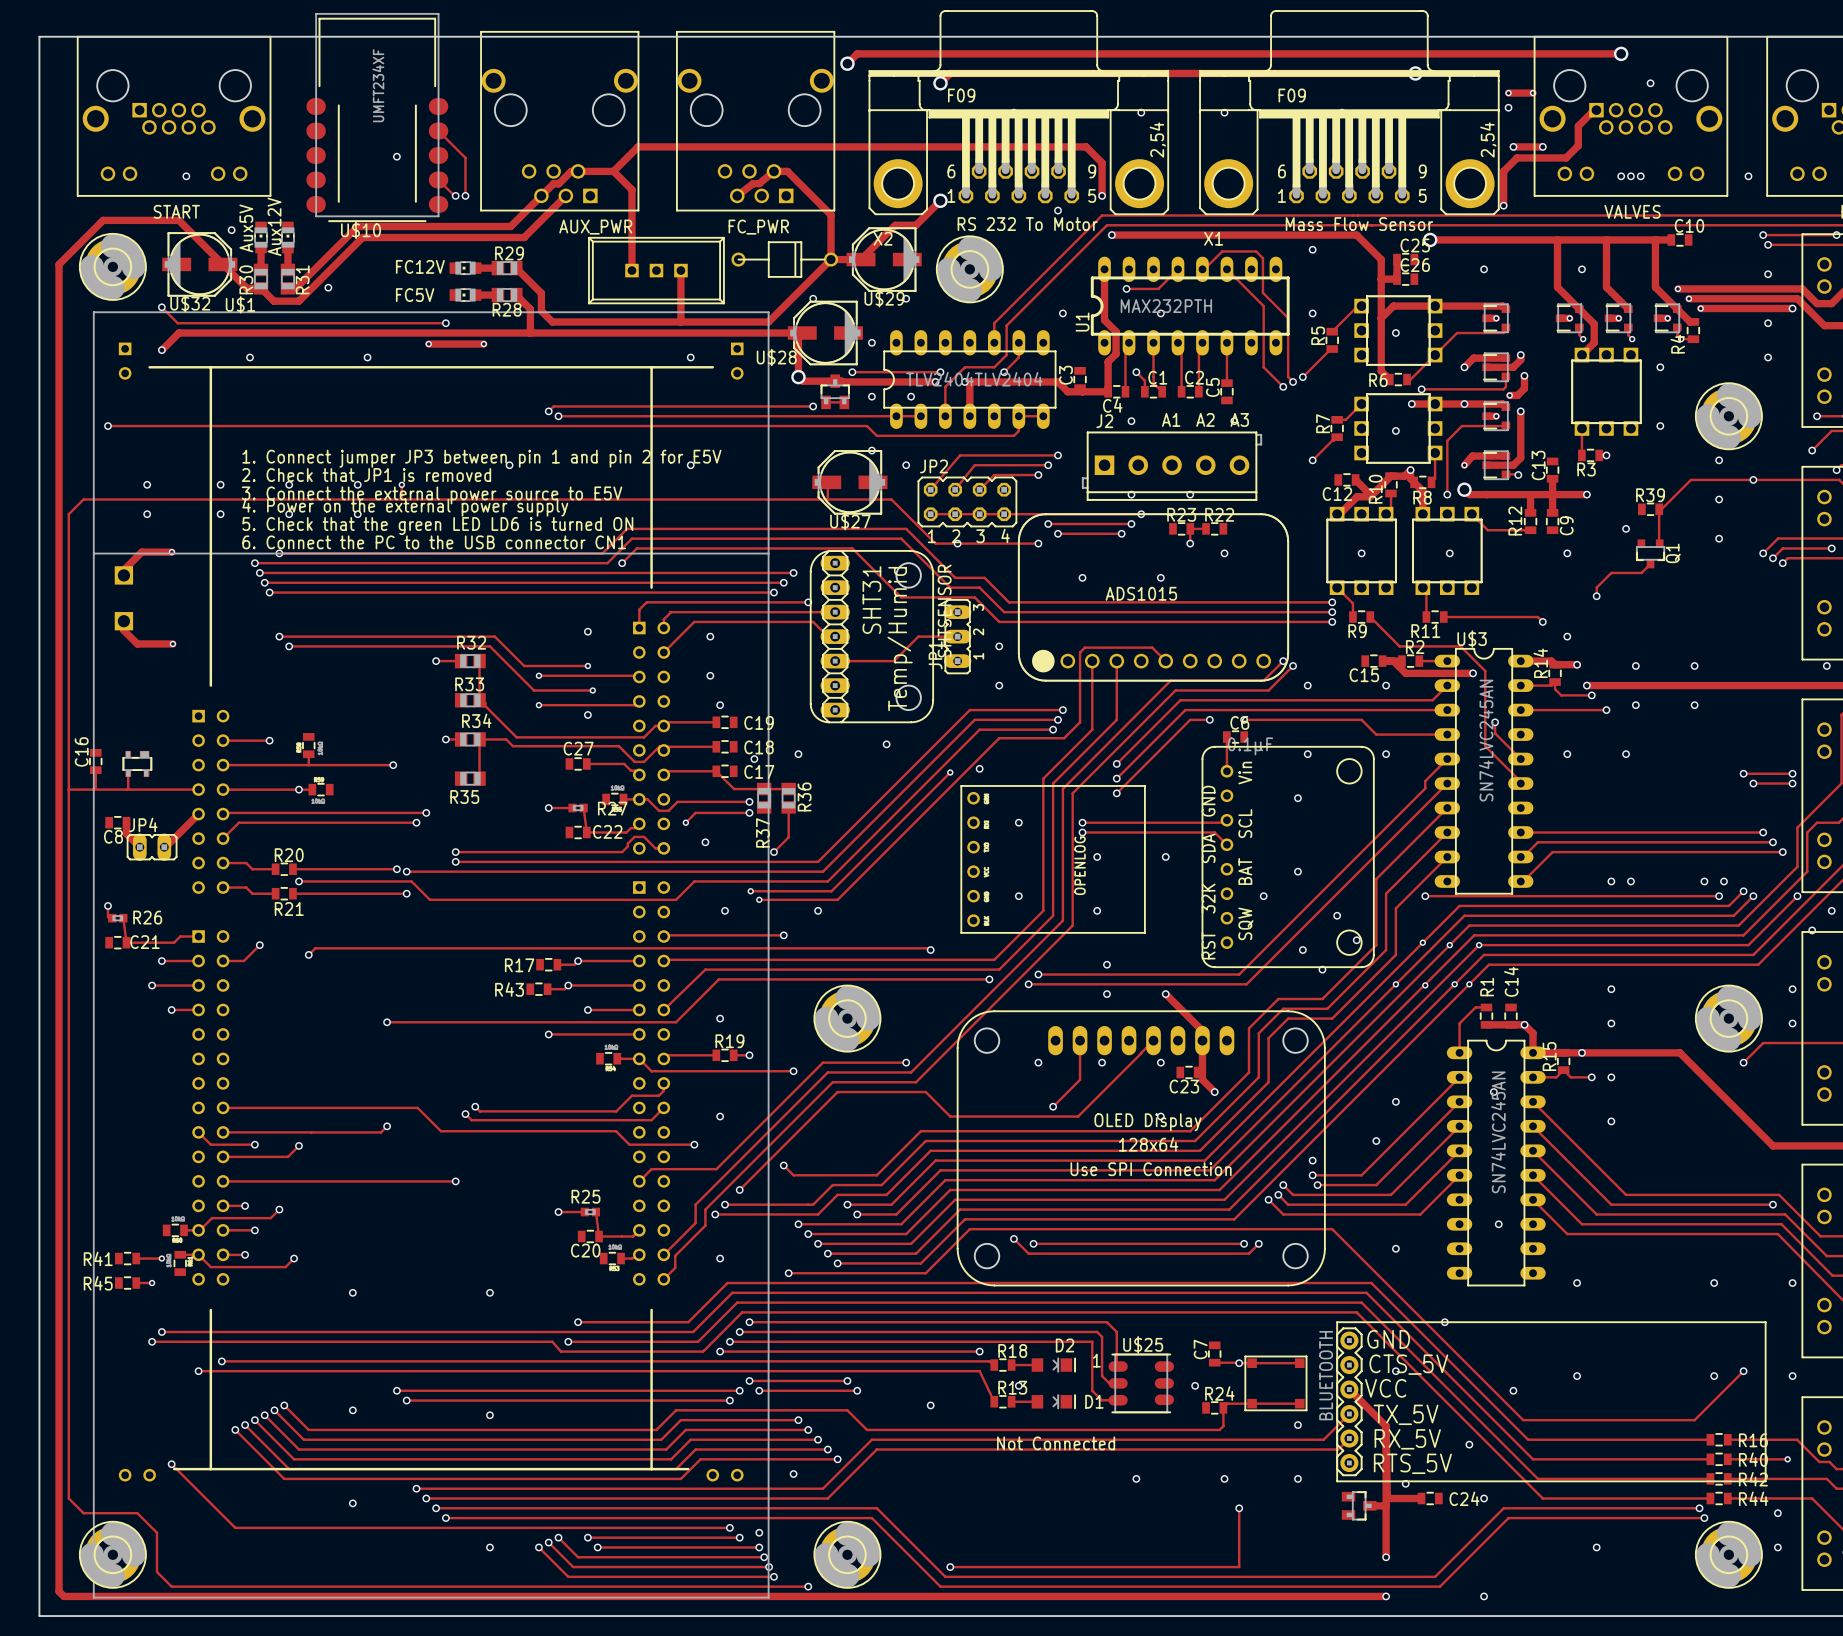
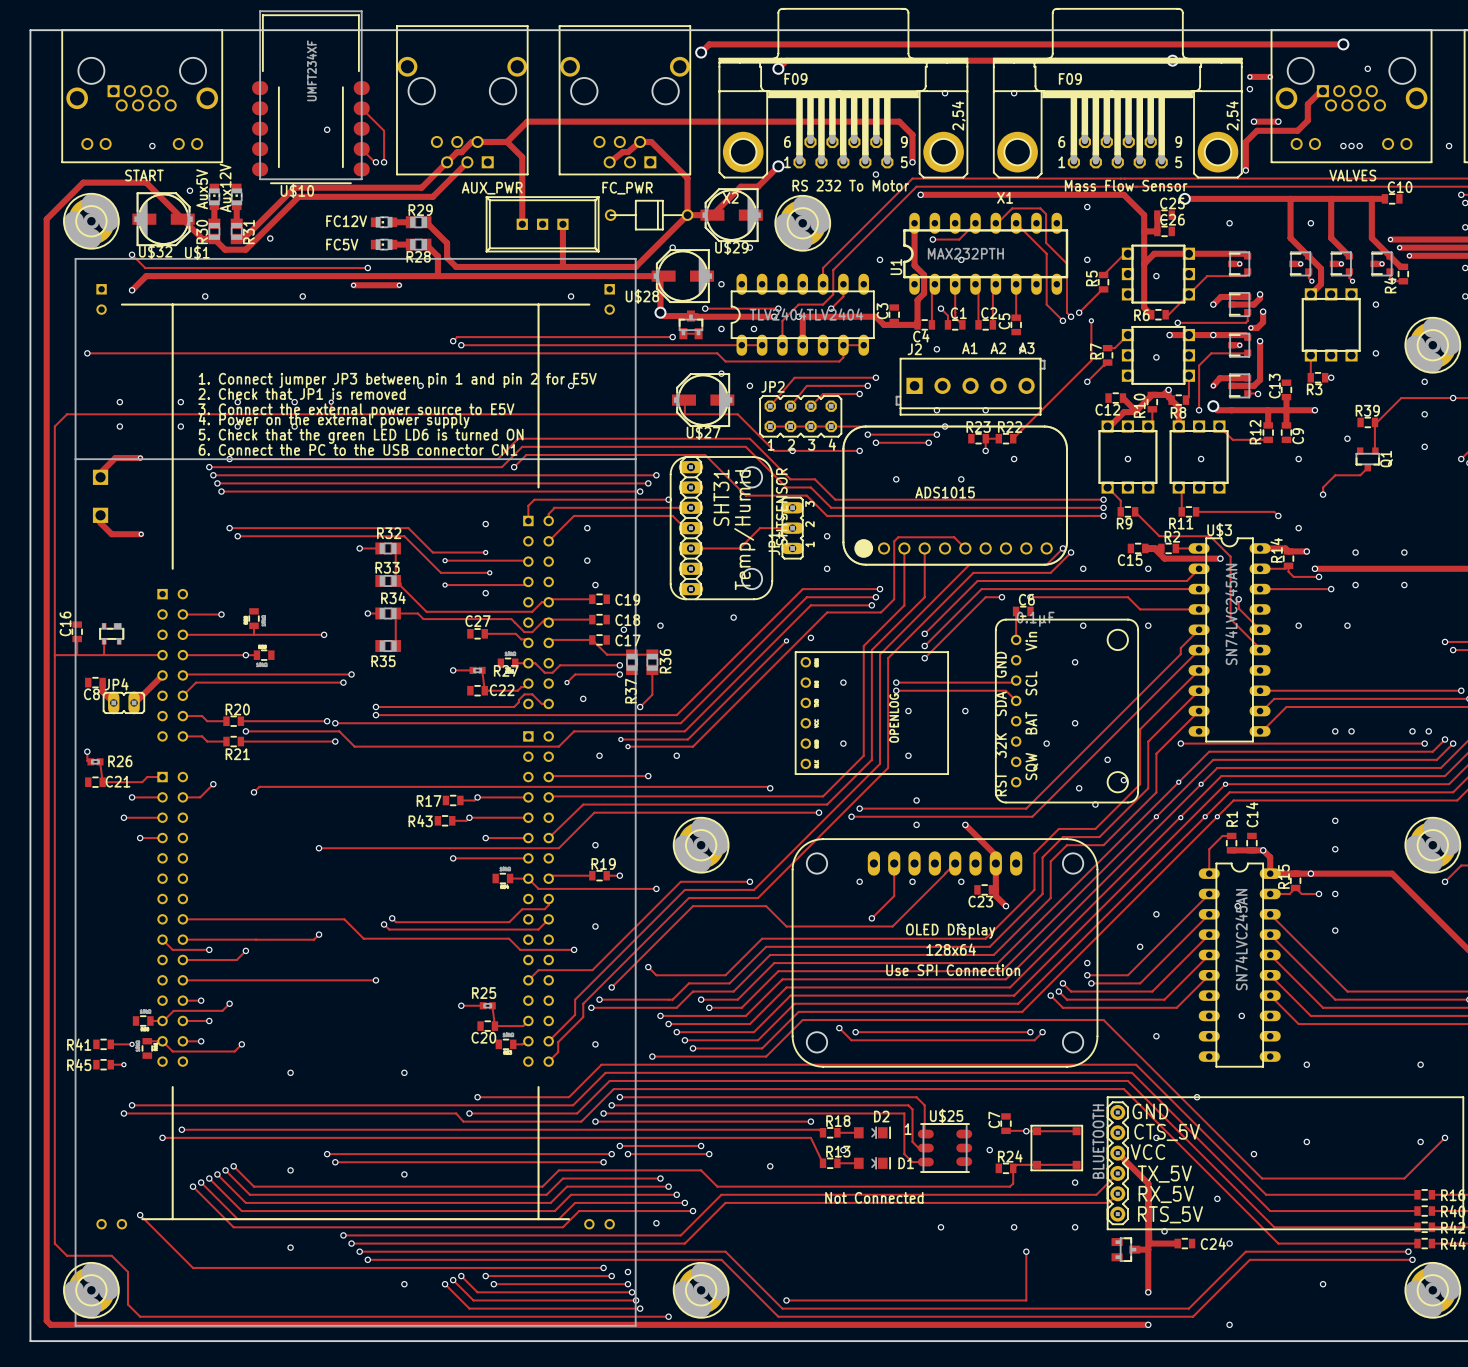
track: none -> (1091, 320) (1091, 360) (1013, 438)
via: none -> (1091, 320)

